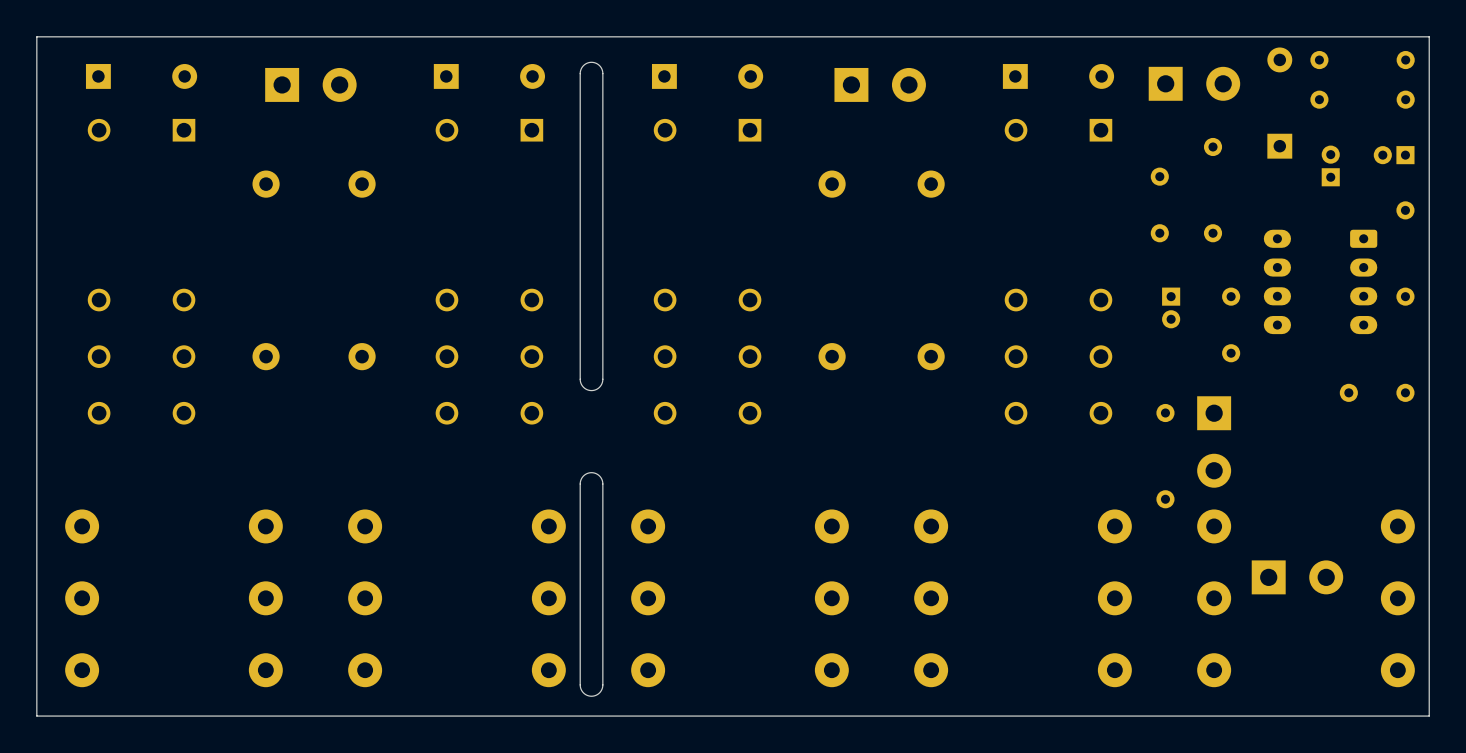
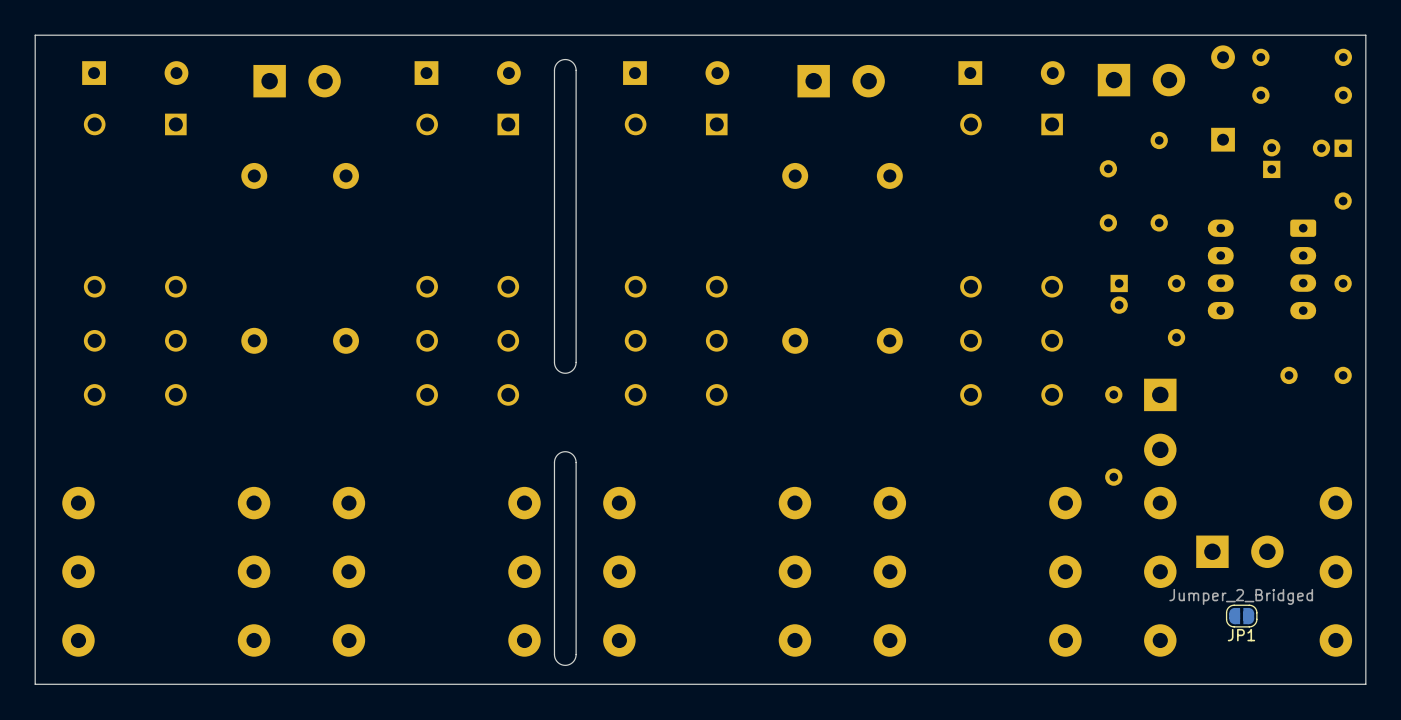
JP1: none -> Jumper_2_Bridged (1241, 616)

